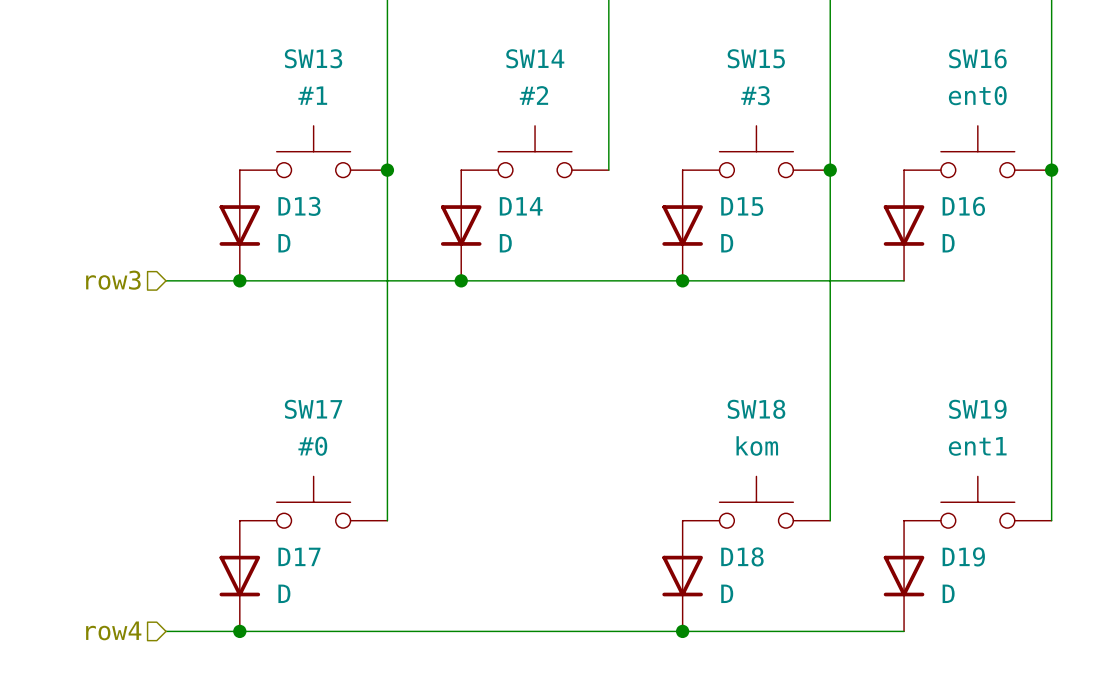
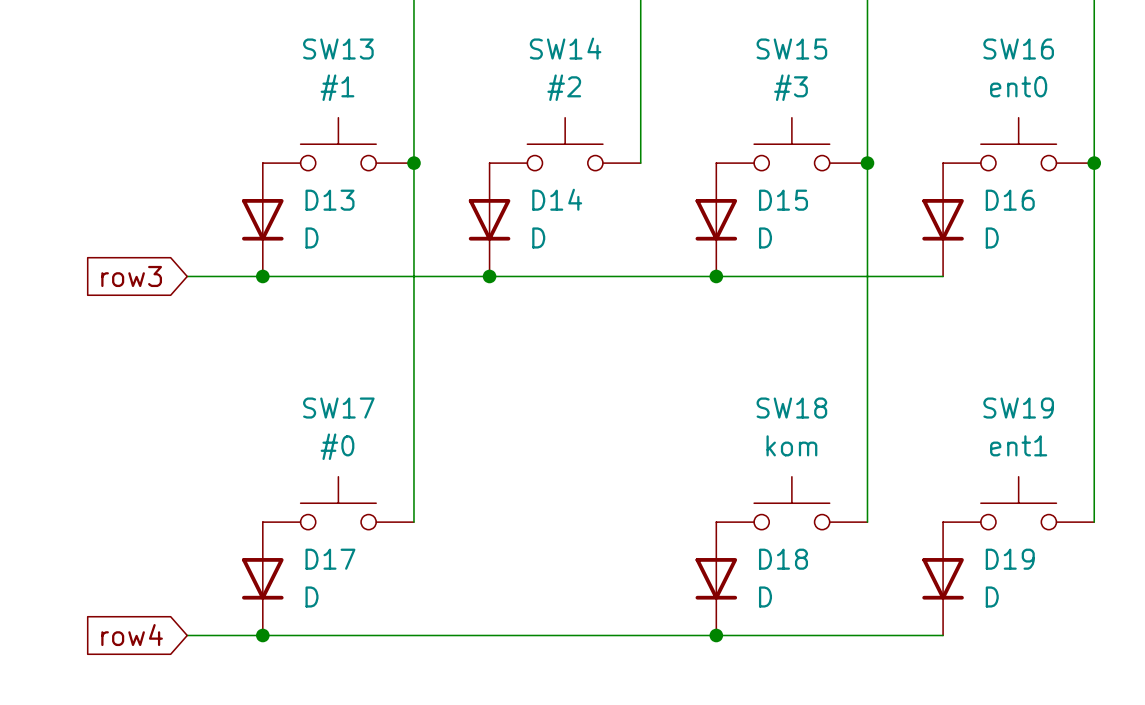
hierarchical label: row3 (113, 280) -> none
global label: none -> row3 (131, 276)
hierarchical label: row4 (113, 630) -> none
global label: none -> row4 (132, 635)

